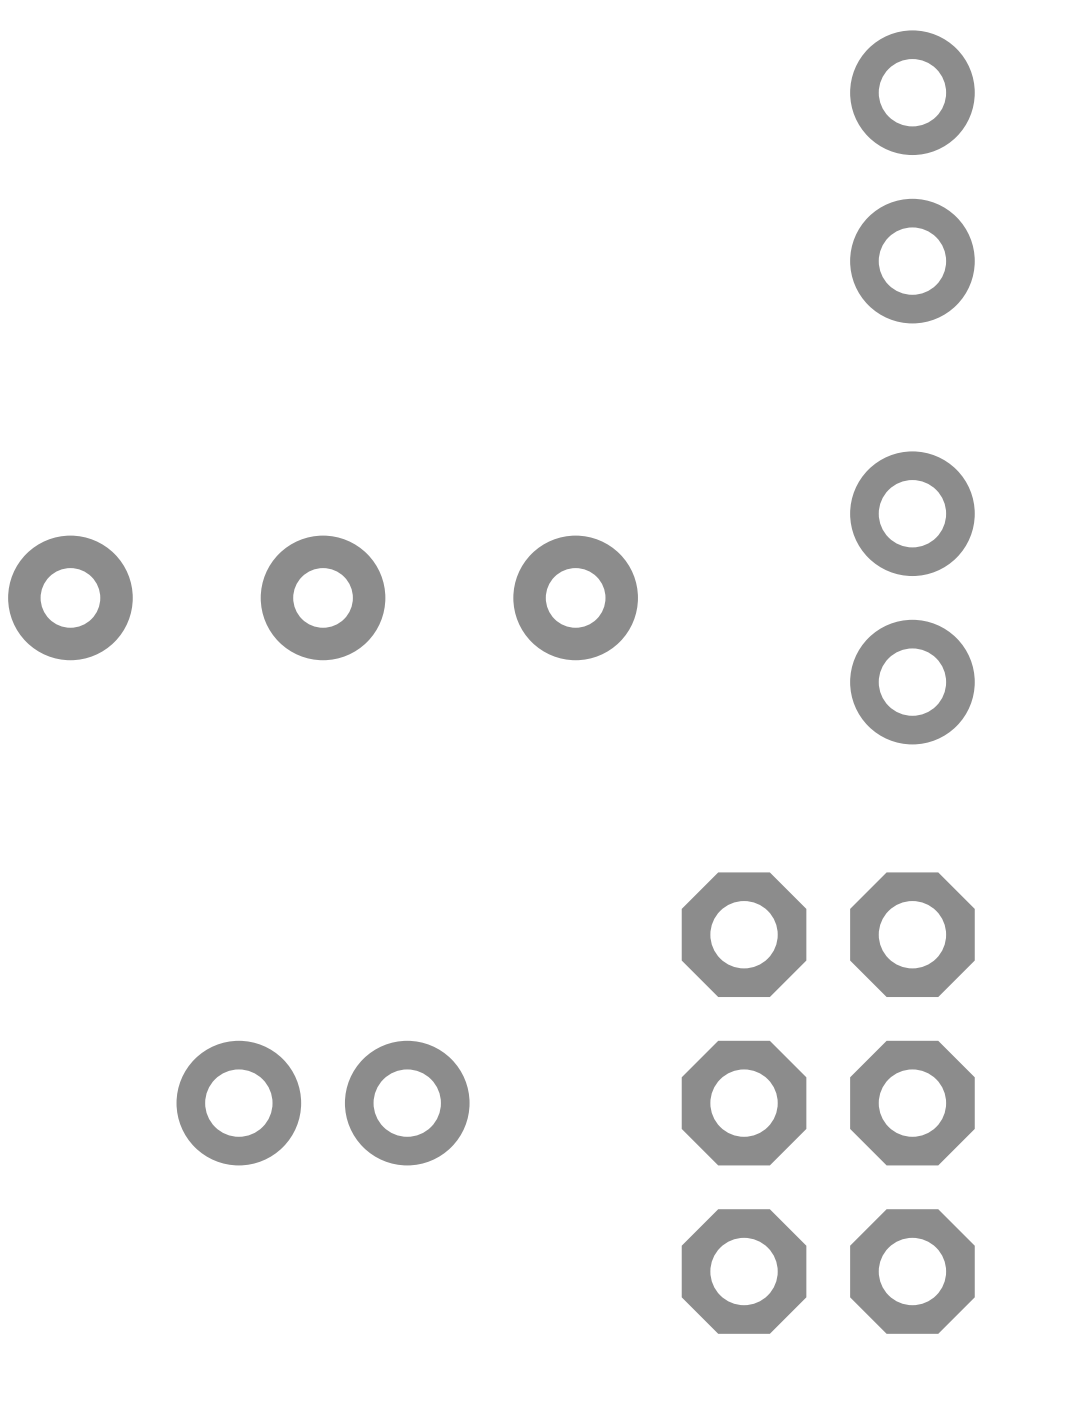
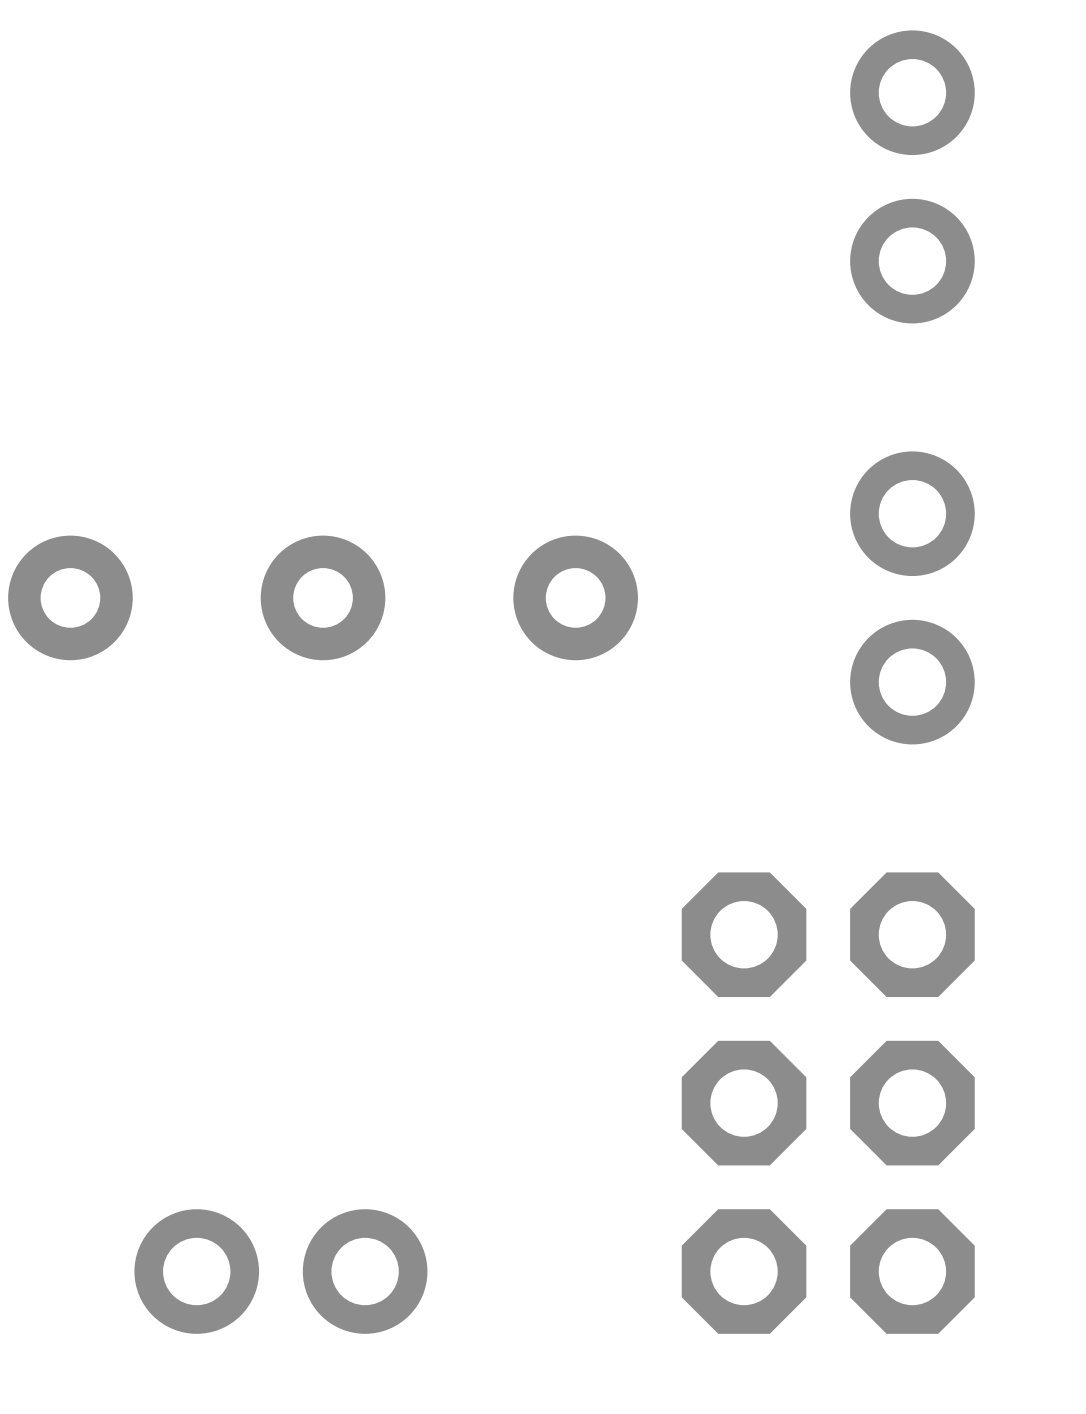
part position: (323, 1103) -> (280, 1271)

